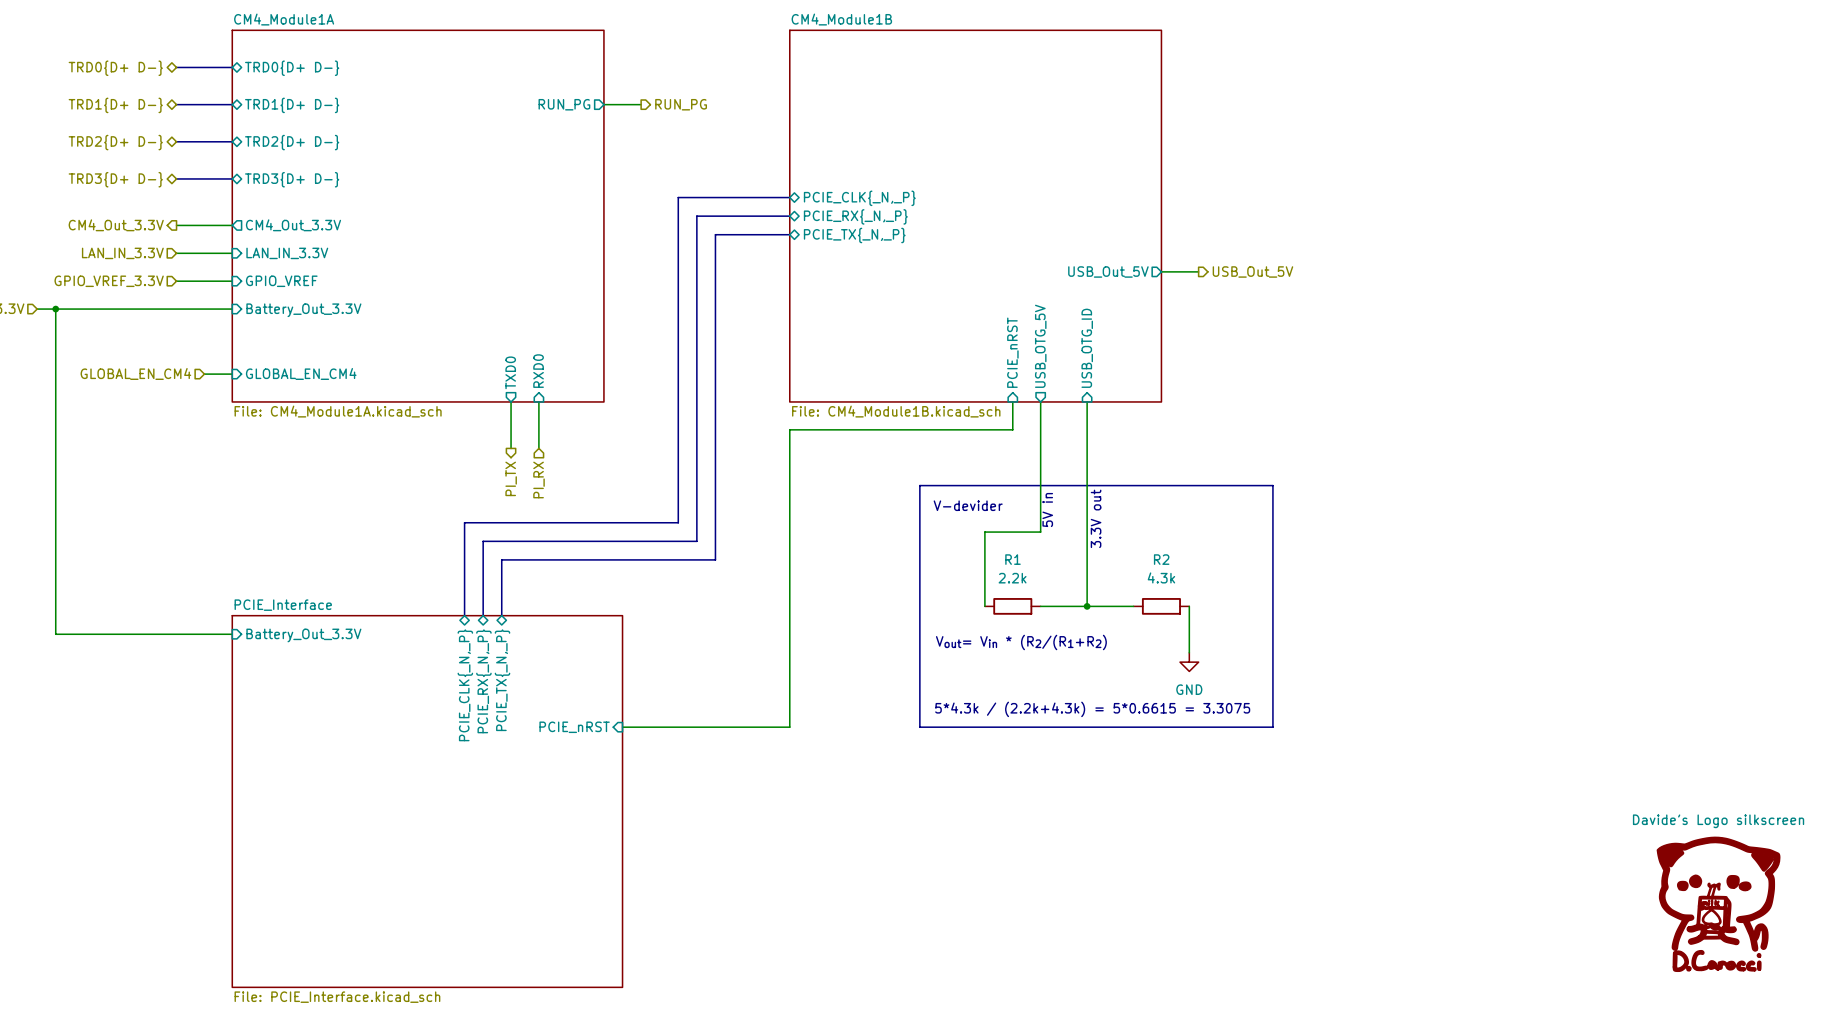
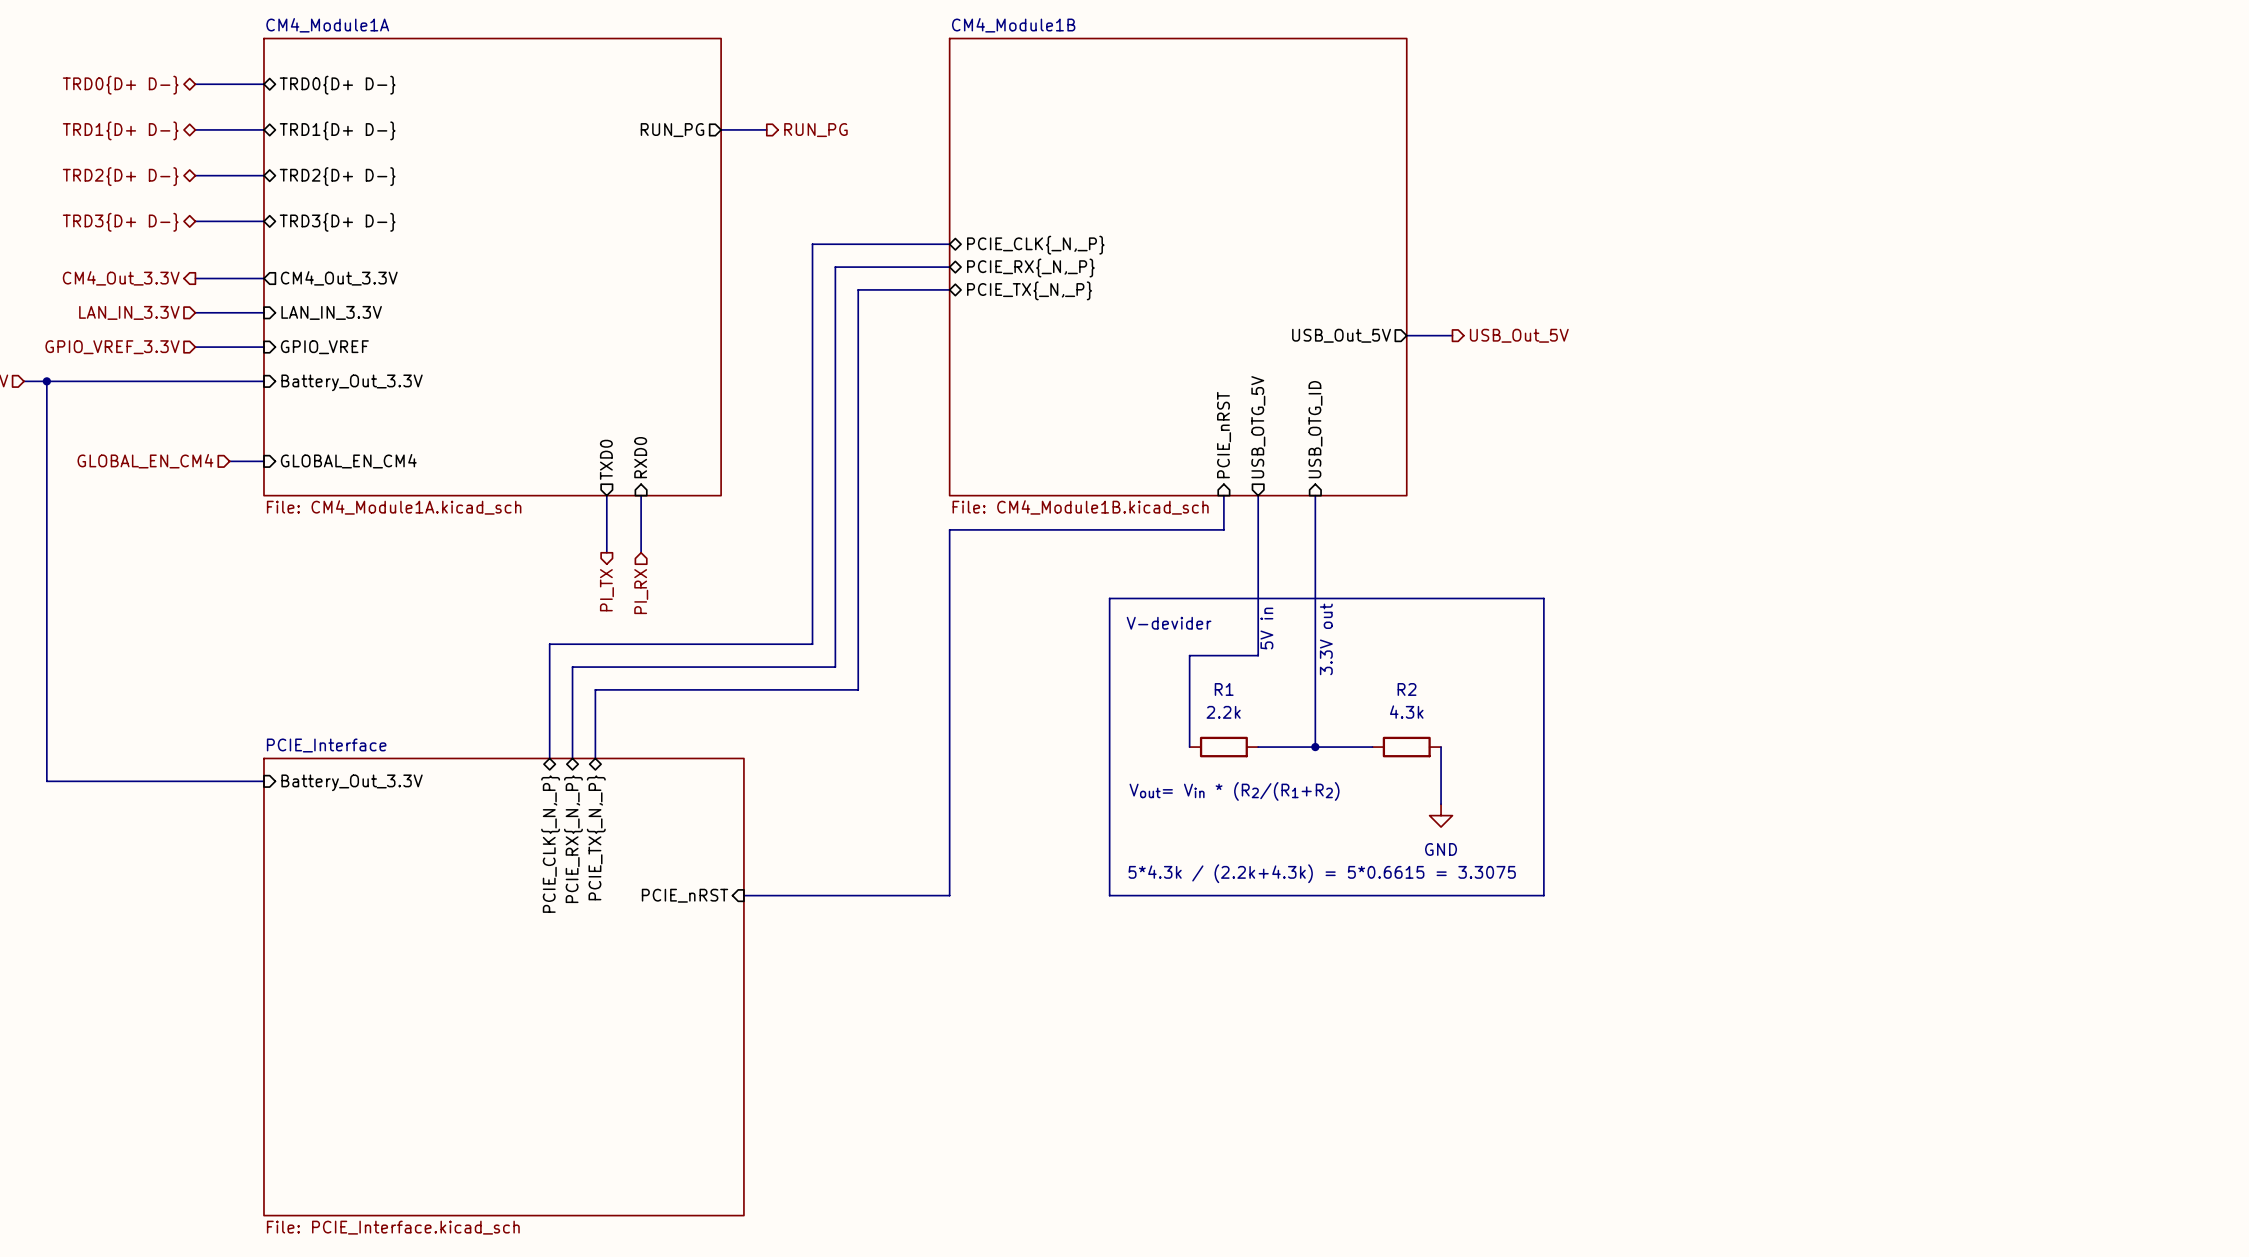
power symbol: Davide's Logo silkscreen (1718, 904) -> none

